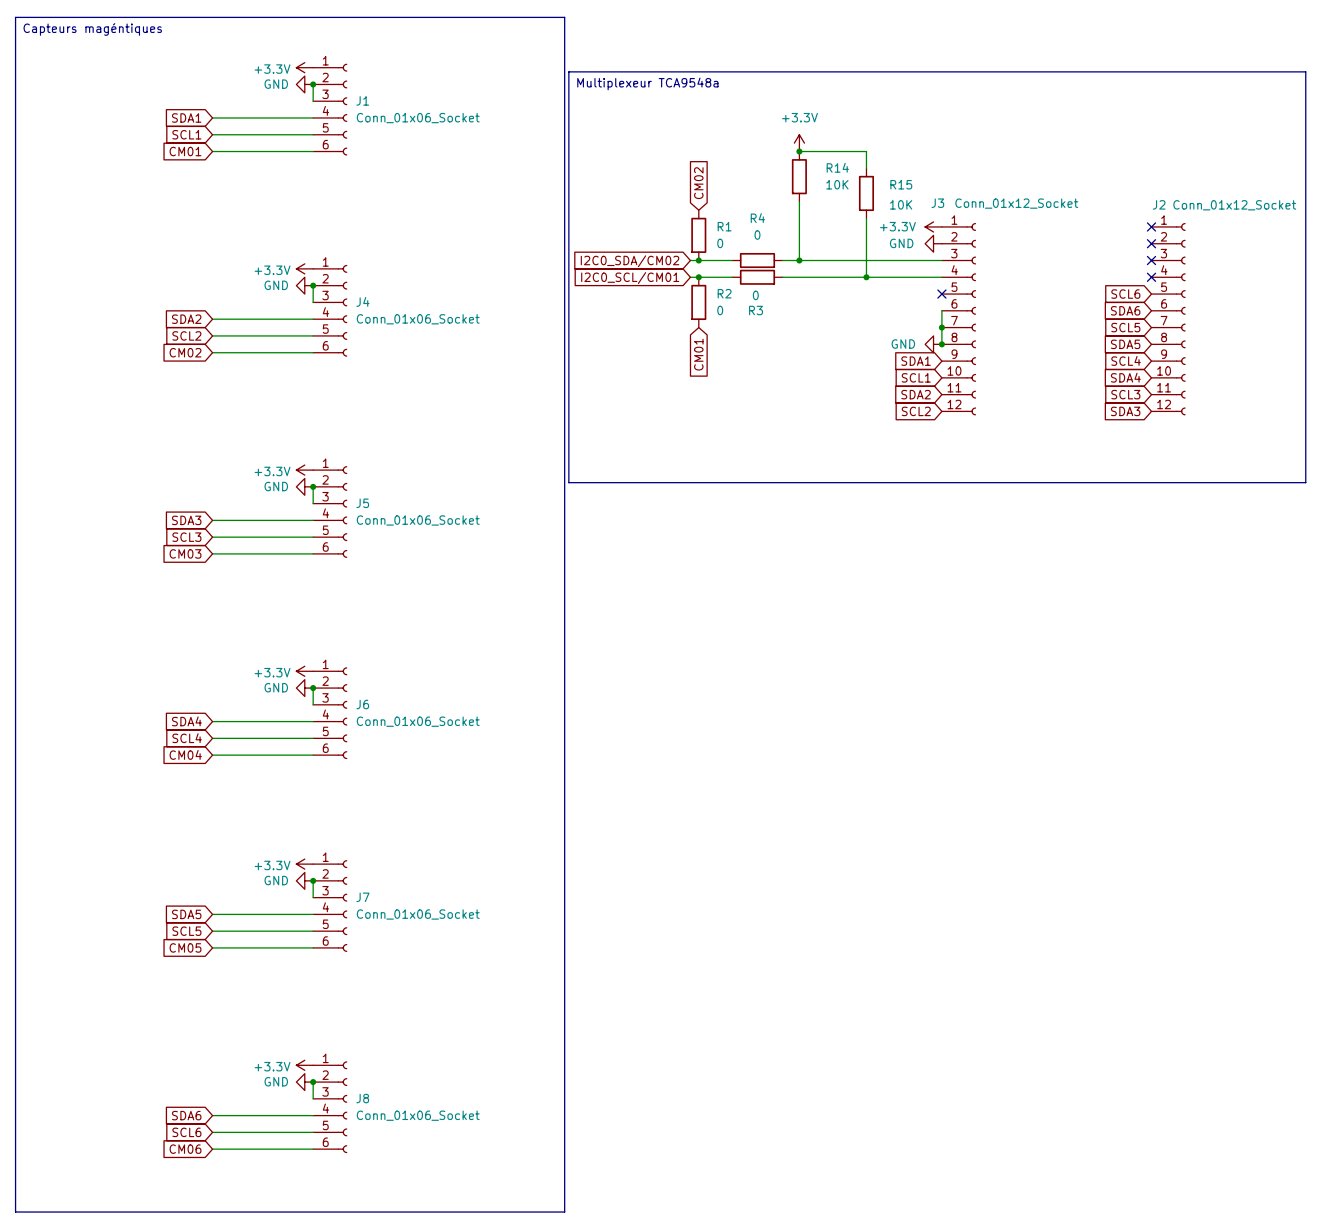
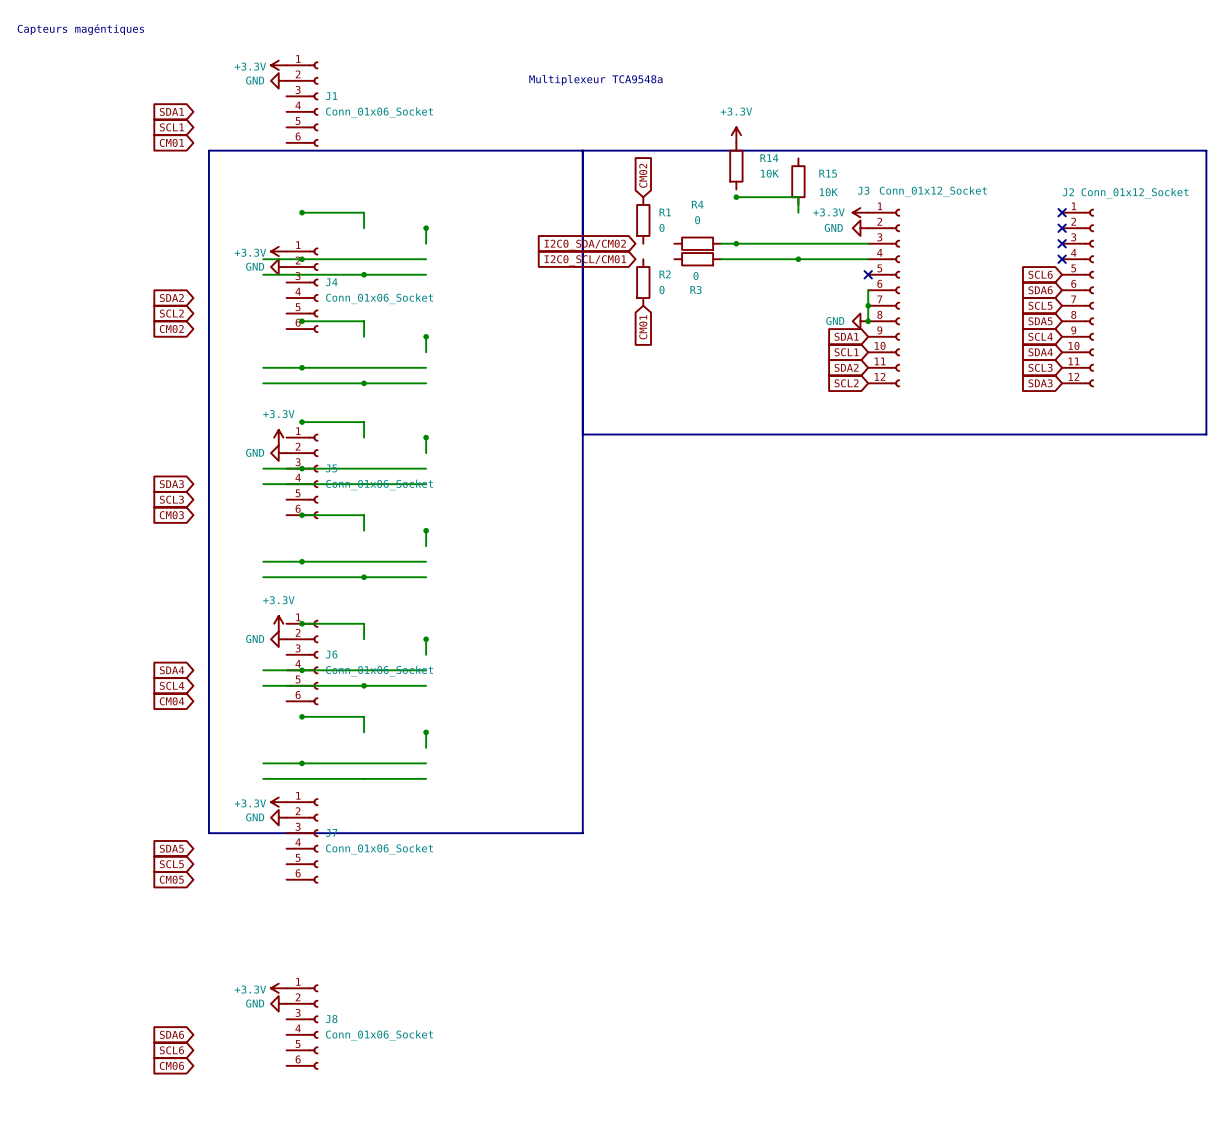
line: (15, 17) (564, 17) (564, 1212) (15, 1212) (15, 17) -> none
line: (568, 71) (1305, 71) (1305, 482) (568, 482) (568, 71) -> none
wire: (313, 84) (313, 101) -> none
junction: (313, 84) -> none
wire: (212, 117) (313, 117) -> none
wire: (212, 134) (313, 134) -> none
wire: (212, 151) (313, 151) -> none
wire: (799, 151) (866, 151) (866, 168) -> none
junction: (799, 151) -> none
line: none -> (582, 150) (582, 833) (208, 833) (208, 150) (1206, 150) (1206, 434) (582, 434)
wire: (799, 201) (799, 260) -> none
wire: none -> (736, 197) (798, 197) (798, 204)
junction: none -> (736, 197)
wire: none -> (302, 212) (364, 212) (364, 228)
junction: none -> (302, 212)
wire: (866, 226) (866, 277) -> none
junction: none -> (426, 228)
wire: (690, 260) (732, 260) -> none
junction: (698, 260) -> none
wire: none -> (263, 259) (426, 259)
wire: (690, 277) (732, 277) -> none
junction: (698, 277) -> none
wire: (313, 285) (313, 302) -> (426, 228) (426, 243)
junction position: (313, 285) -> (302, 259)
wire: none -> (263, 274) (426, 274)
junction: none -> (364, 274)
wire: (212, 319) (313, 319) -> none
wire: (212, 335) (313, 335) -> none
wire: none -> (302, 321) (364, 321) (364, 336)
junction: none -> (302, 321)
wire: (212, 352) (313, 352) -> none
wire: none -> (426, 336) (426, 352)
junction: none -> (426, 336)
wire: none -> (263, 367) (426, 367)
junction: none -> (302, 367)
wire: none -> (263, 383) (426, 383)
junction: none -> (364, 383)
wire: none -> (302, 422) (364, 422) (364, 437)
junction: none -> (302, 422)
power symbol rotation: 0° (304, 470) -> 90° clockwise (278, 437)
junction: none -> (426, 437)
wire: (313, 486) (313, 503) -> (426, 437) (426, 453)
junction: (313, 486) -> none
wire: none -> (263, 468) (426, 468)
junction: none -> (302, 468)
wire: (212, 520) (288, 520) -> none
wire: none -> (286, 484) (426, 484)
wire: (212, 537) (313, 537) -> none
wire: (212, 553) (313, 553) -> none
wire: none -> (302, 515) (364, 515) (364, 530)
junction: none -> (302, 515)
wire: none -> (426, 530) (426, 546)
junction: none -> (426, 530)
wire: none -> (263, 561) (426, 561)
junction: none -> (302, 561)
wire: none -> (263, 577) (426, 577)
junction: none -> (364, 577)
power symbol rotation: 0° (304, 671) -> 90° clockwise (278, 623)
wire: none -> (302, 623) (364, 623) (364, 639)
junction: none -> (302, 623)
wire: (313, 688) (313, 704) -> (426, 639) (426, 654)
junction: (313, 688) -> none
junction: none -> (426, 639)
wire: (212, 721) (288, 721) -> none
wire: none -> (286, 670) (426, 670)
junction: none -> (302, 670)
wire: (212, 738) (288, 738) -> none
wire: none -> (286, 685) (426, 685)
junction: none -> (364, 685)
wire: (212, 755) (313, 755) -> none
wire: none -> (302, 716) (364, 716) (364, 732)
junction: none -> (302, 716)
wire: none -> (426, 732) (426, 747)
junction: none -> (426, 732)
wire: none -> (263, 763) (426, 763)
junction: none -> (302, 763)
wire: none -> (263, 778) (426, 778)
wire: (313, 880) (313, 897) -> none
junction: (313, 880) -> none
wire: (212, 914) (313, 914) -> none
wire: (212, 931) (313, 931) -> none
wire: (212, 947) (313, 947) -> none
wire: (313, 1082) (313, 1098) -> none
junction: (313, 1082) -> none
wire: (212, 1115) (313, 1115) -> none
wire: (212, 1132) (313, 1132) -> none
wire: (212, 1149) (313, 1149) -> none

